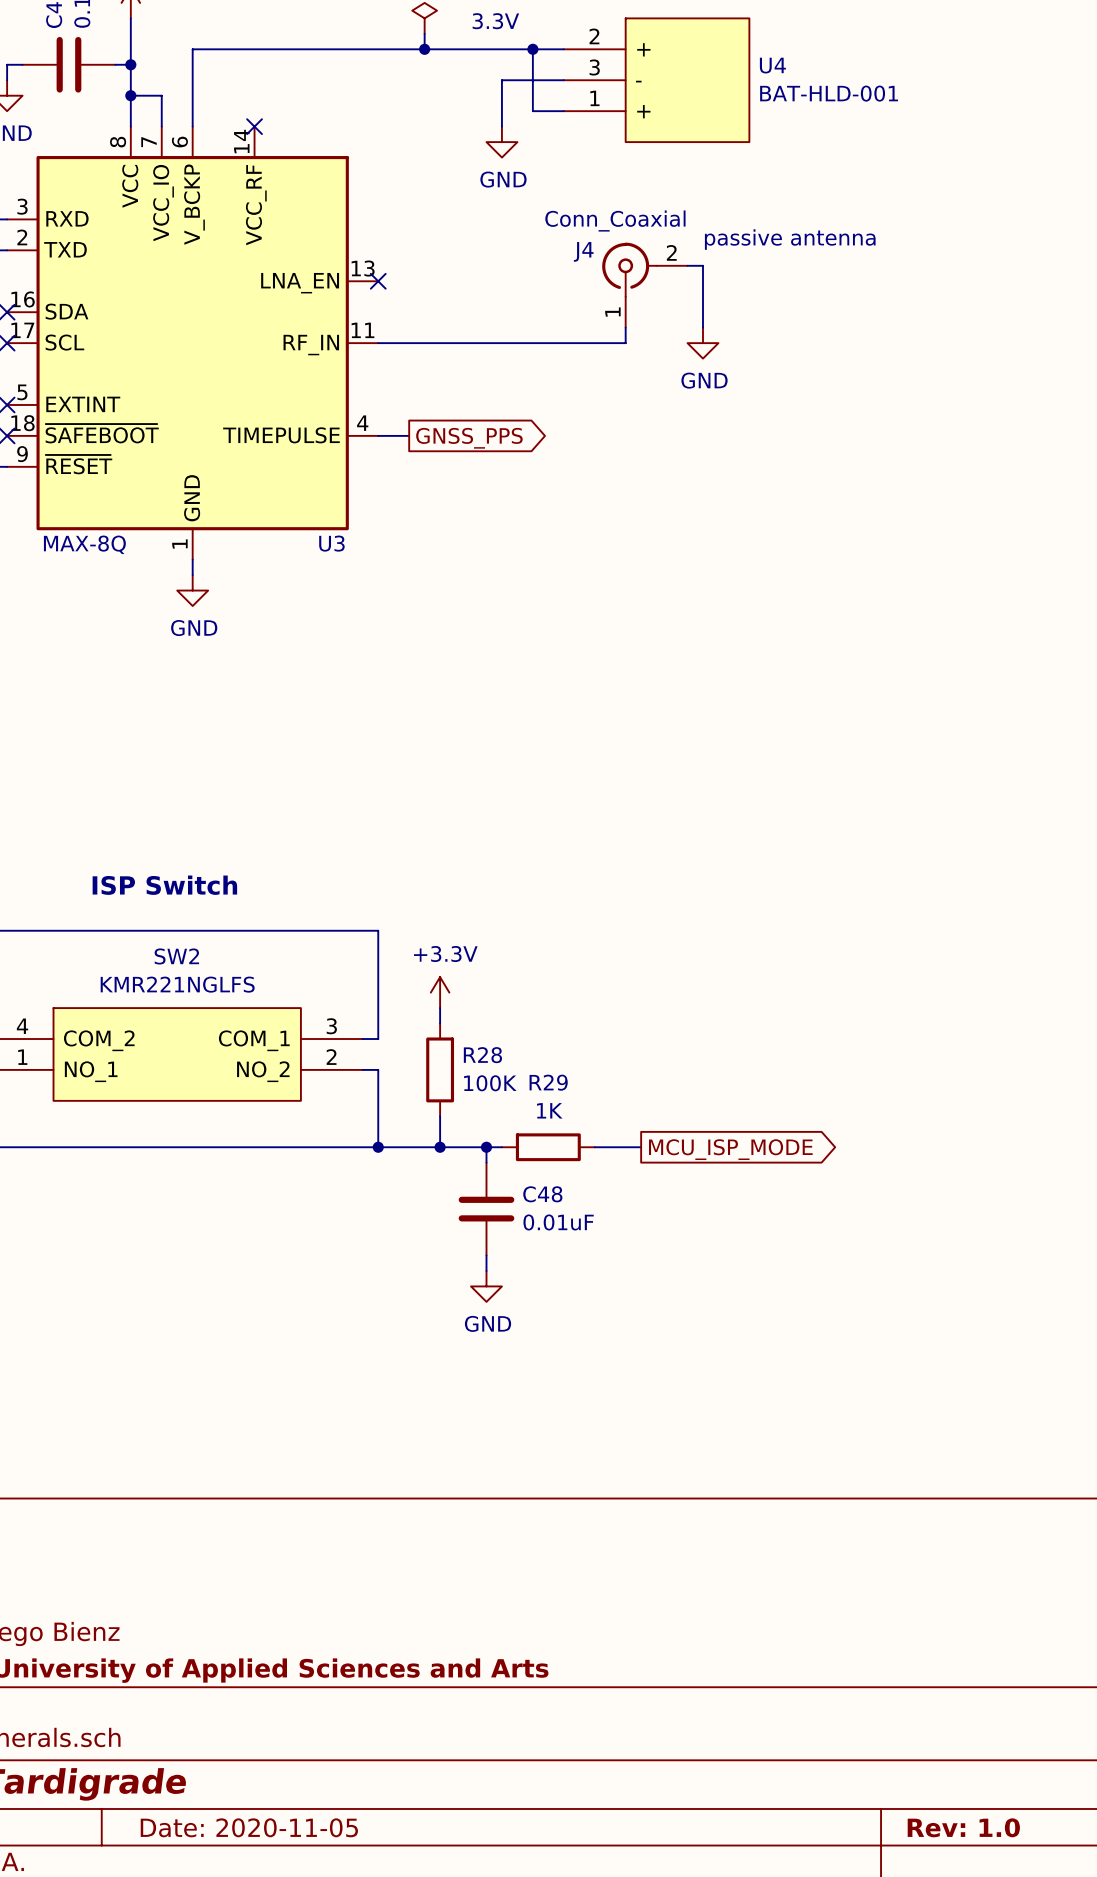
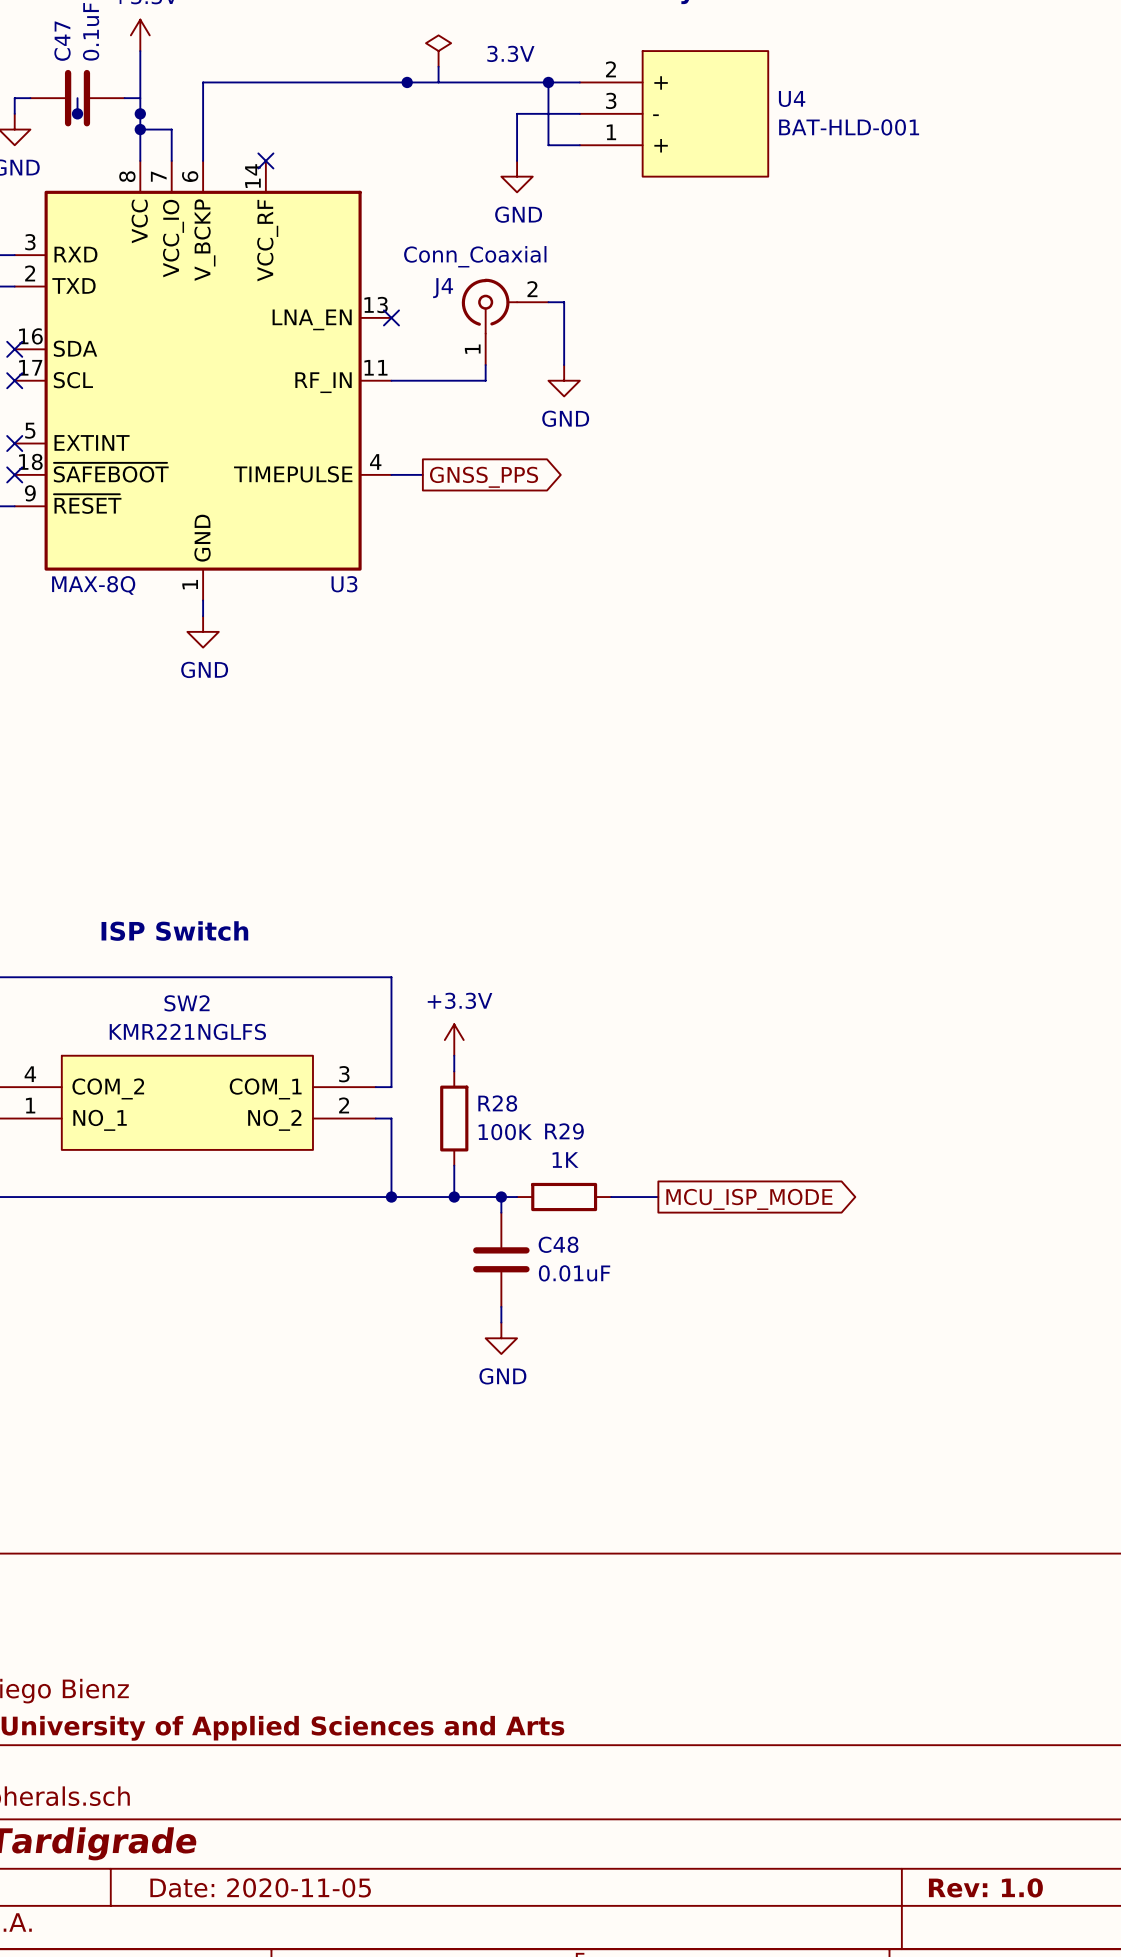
junction position: (424, 49) -> (407, 82)
wire: none -> (77, 98) (77, 113)
junction position: (130, 64) -> (140, 113)
junction: none -> (77, 113)
text: passive antenna (790, 239) -> none
wire: (687, 265) (702, 265) (702, 327) -> (548, 302) (564, 302) (564, 365)
J4 position: (644, 285) -> (505, 321)
wire: (625, 327) (625, 343) (471, 343) -> (485, 365) (485, 380)
power symbol position: GND (702, 343) -> GND (564, 380)

